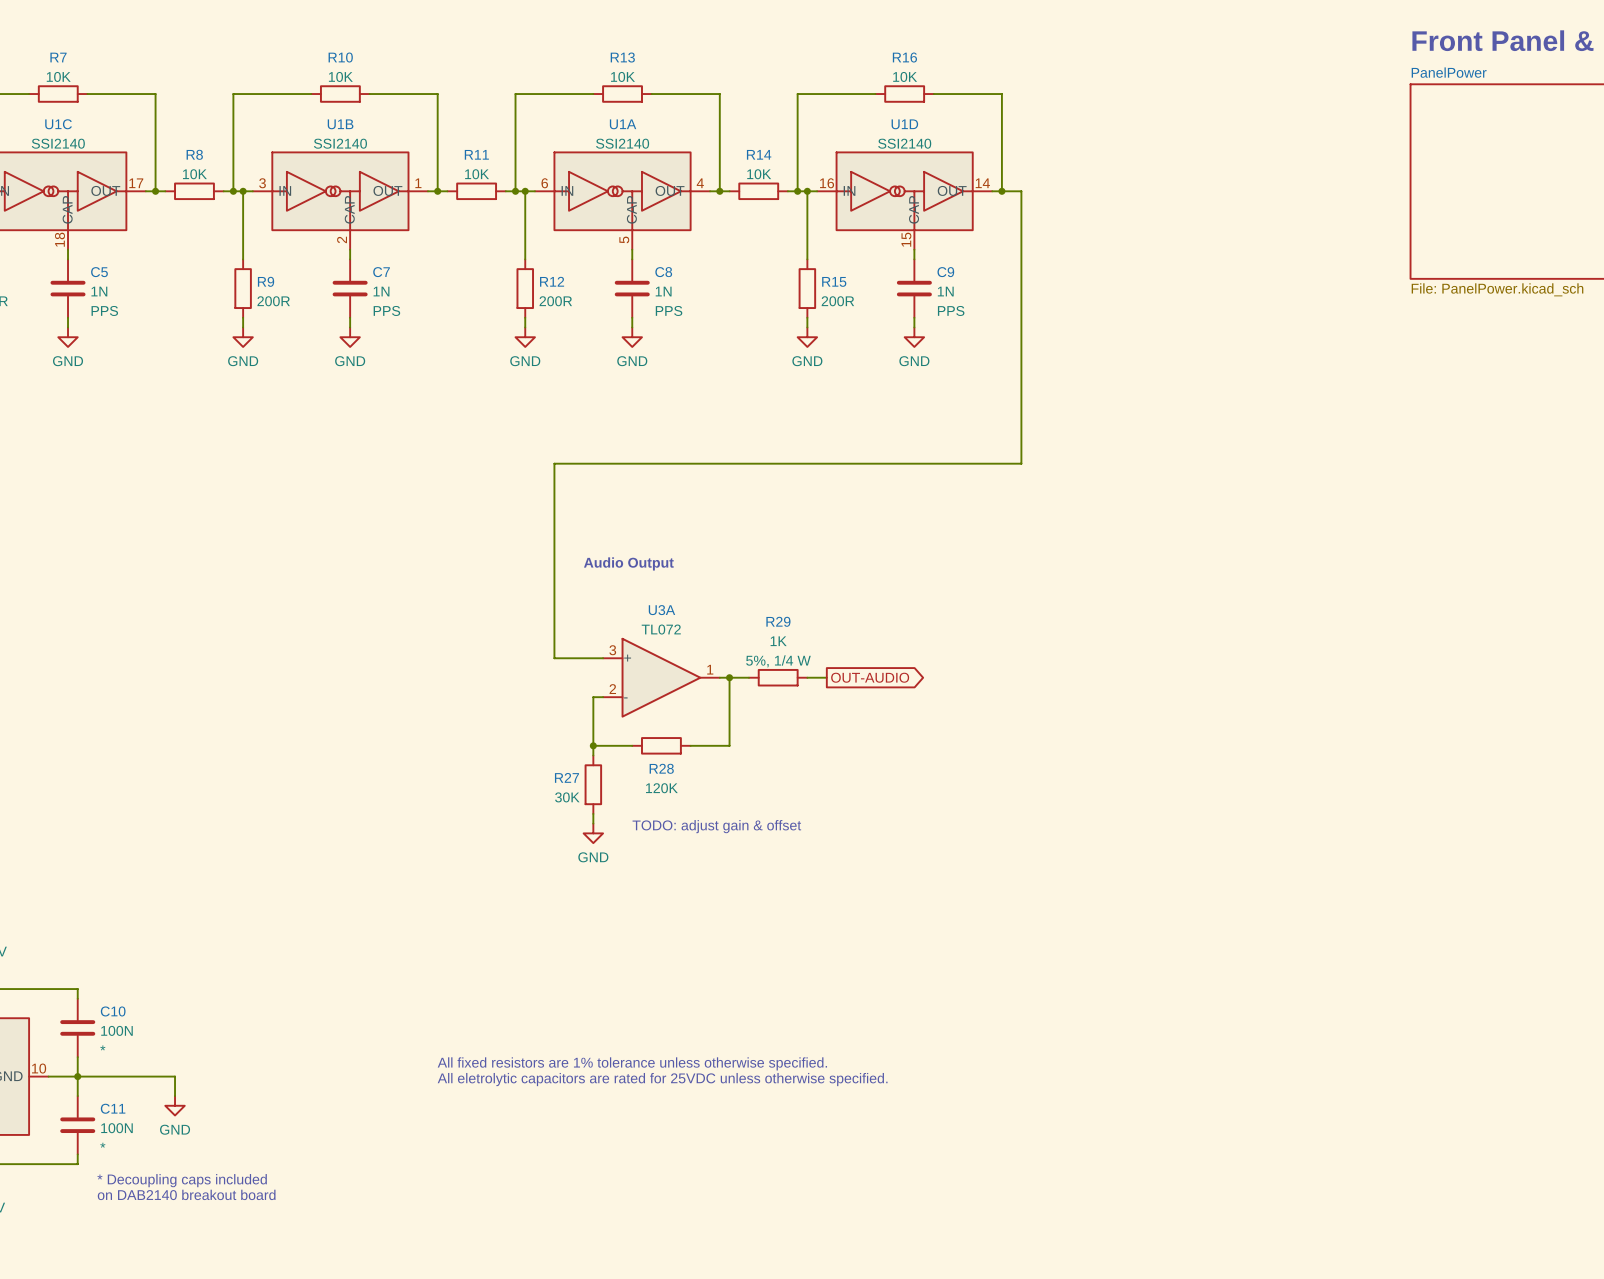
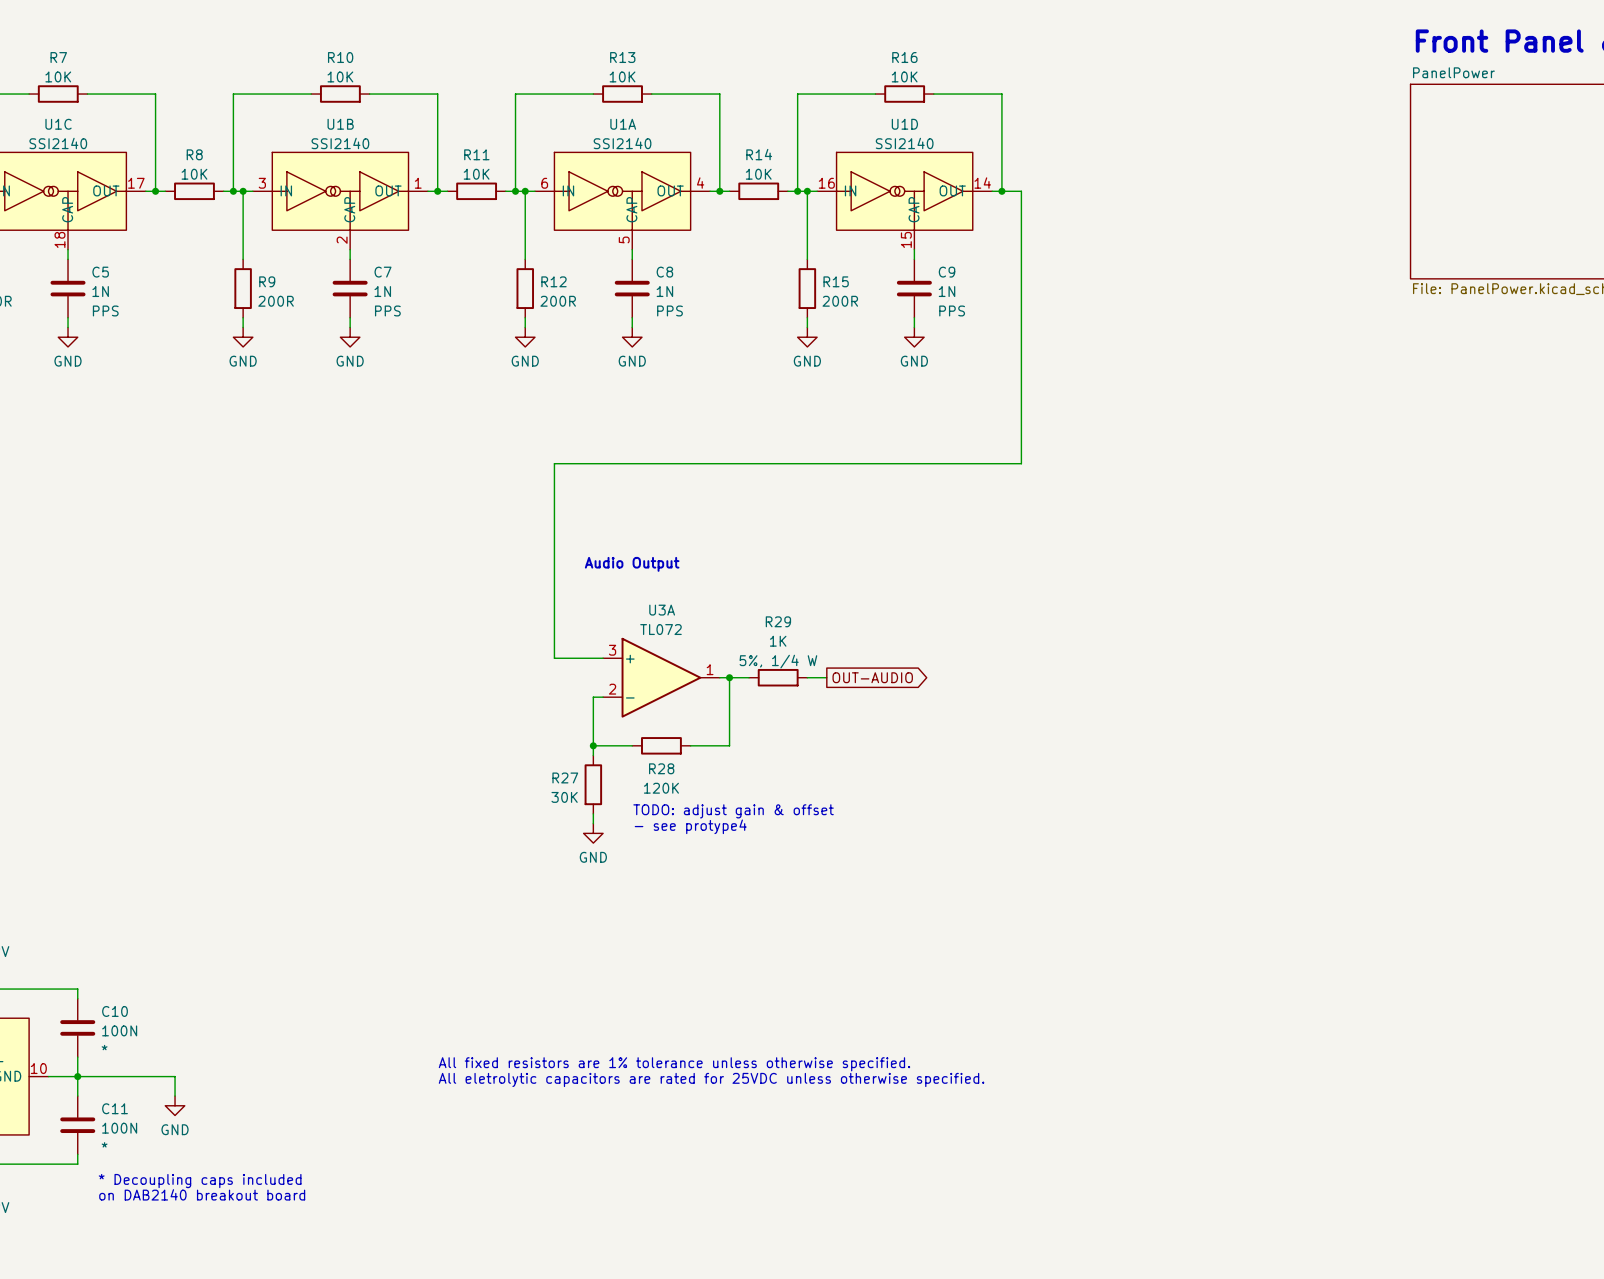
text: none -> TODO: adjust gain & offset (733, 811)
text: TODO: adjust gain & offset (716, 826) -> - see protype4 (690, 826)

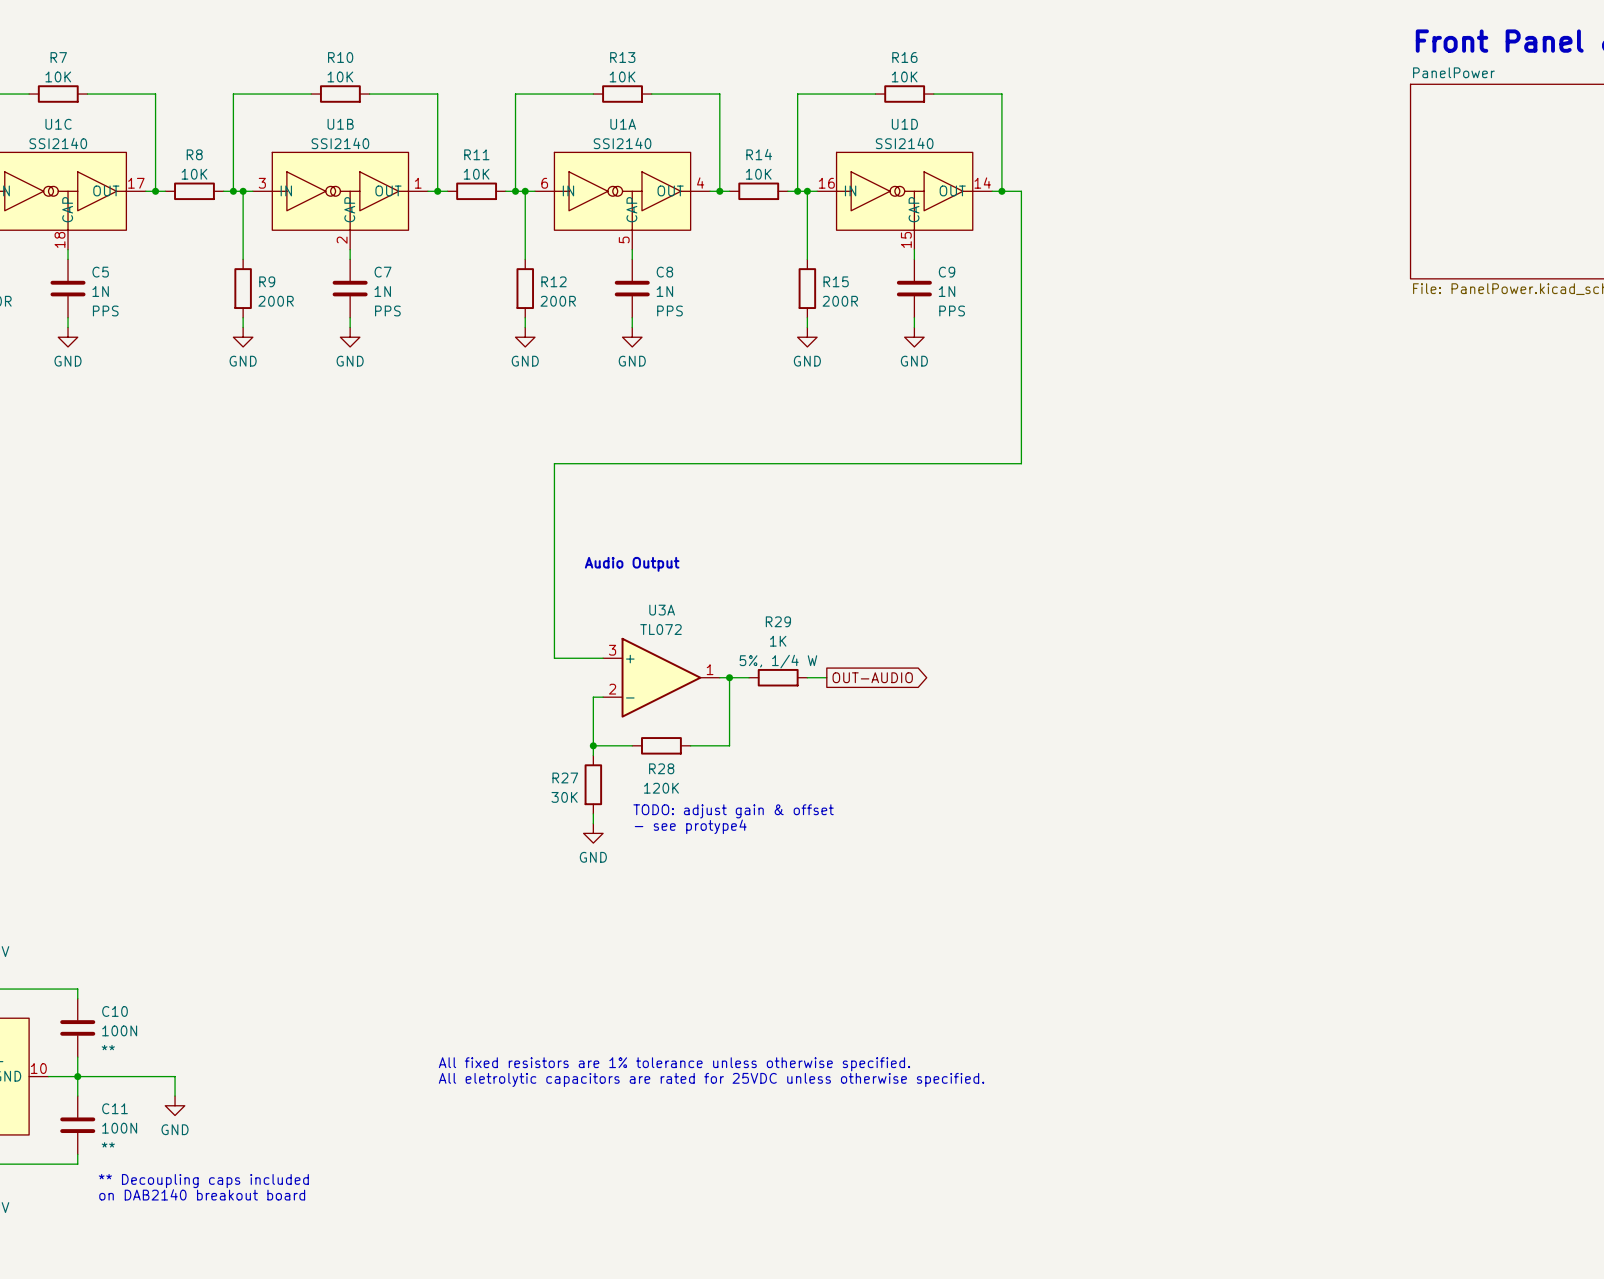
C10 text: * (104, 1047) -> ** (108, 1047)
C11 text: * (104, 1144) -> ** (108, 1144)
text: * Decoupling caps included (200, 1181) -> ** Decoupling caps included (203, 1181)

